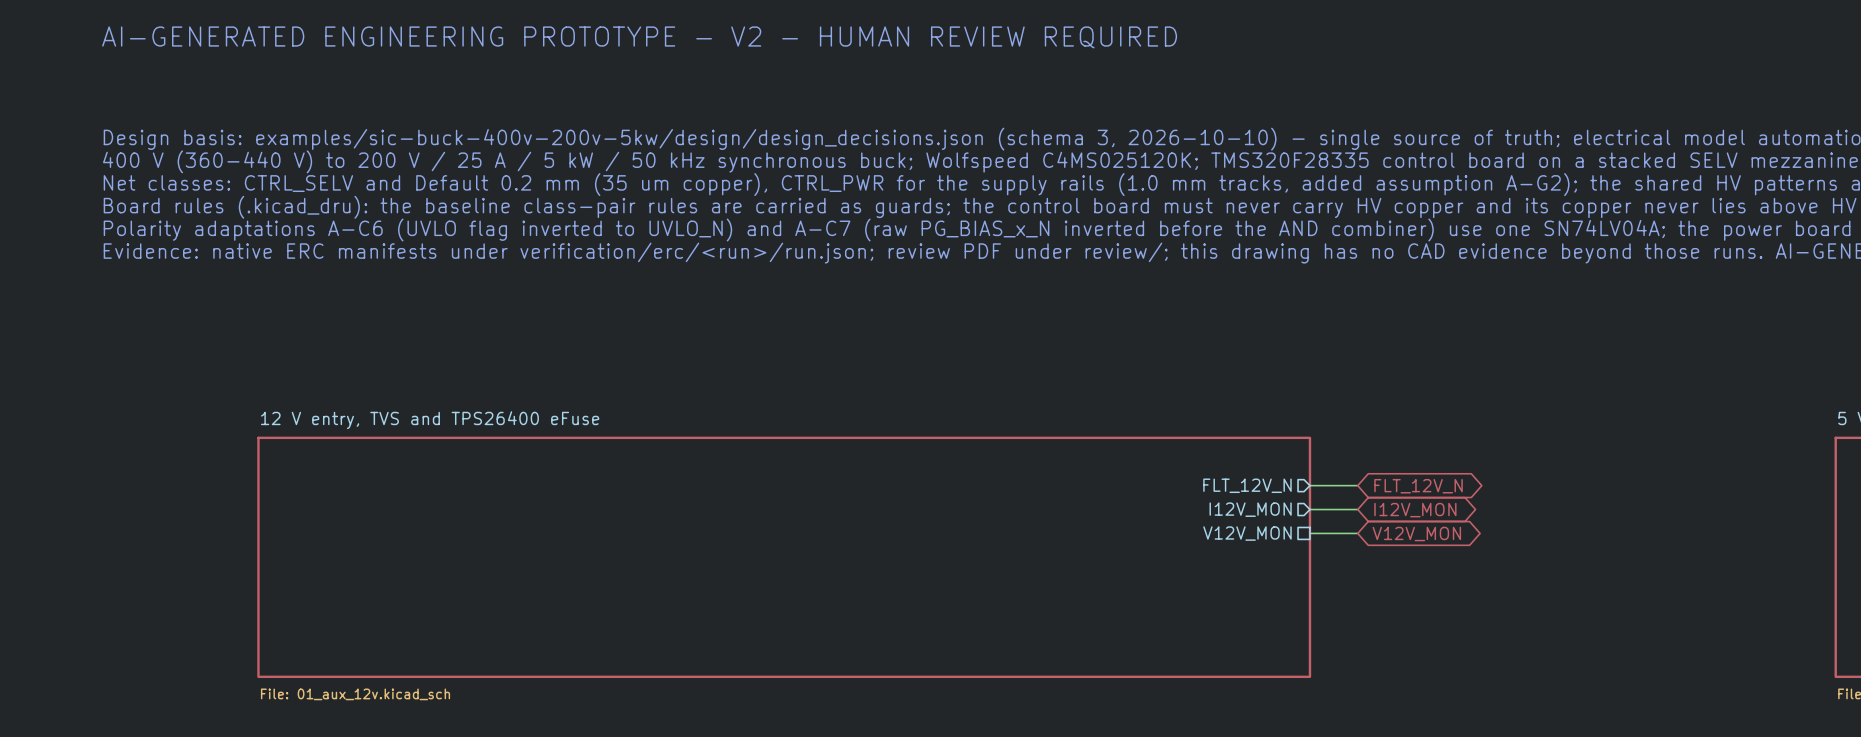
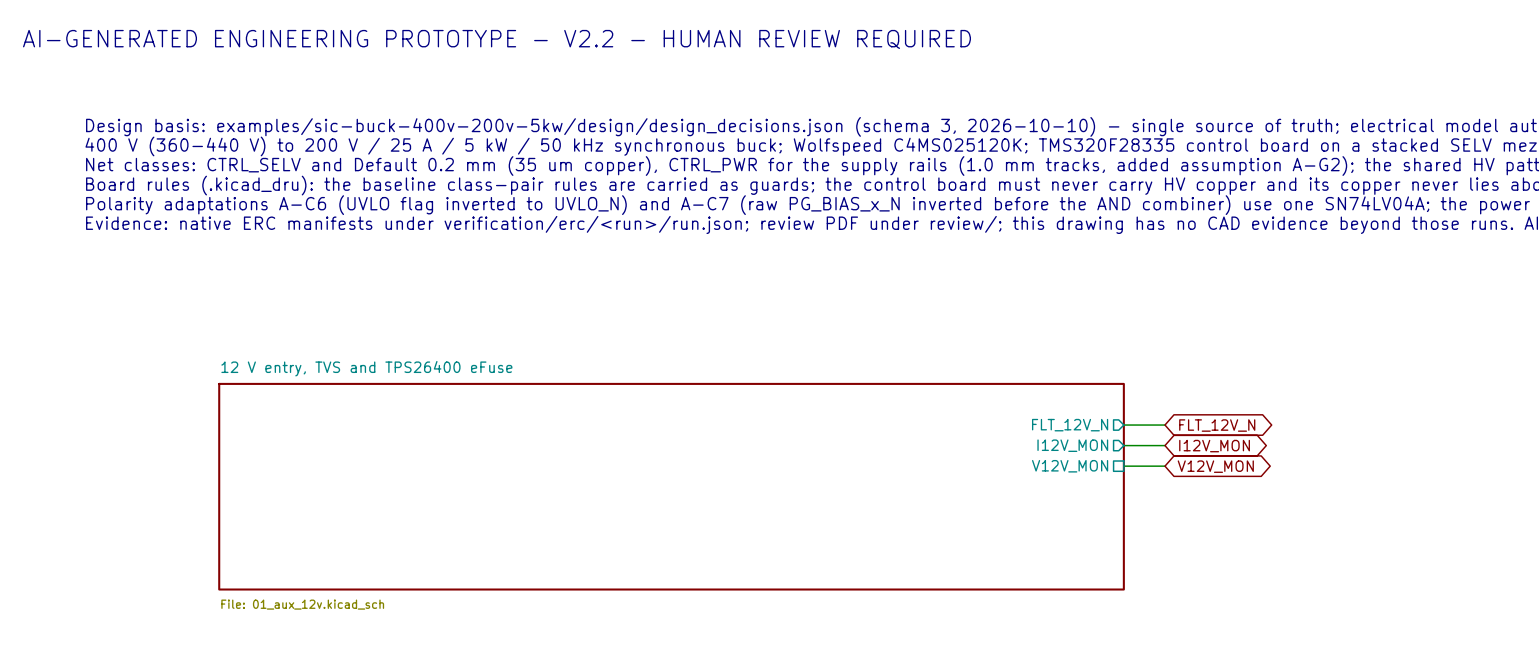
text: AI-GENERATED ENGINEERING PROTOTYPE - V2 - HUMAN REVIEW REQUIRED (639, 37) -> AI-GENERATED ENGINEERING PROTOTYPE - V2.2 - HUMAN REVIEW REQUIRED (497, 39)

